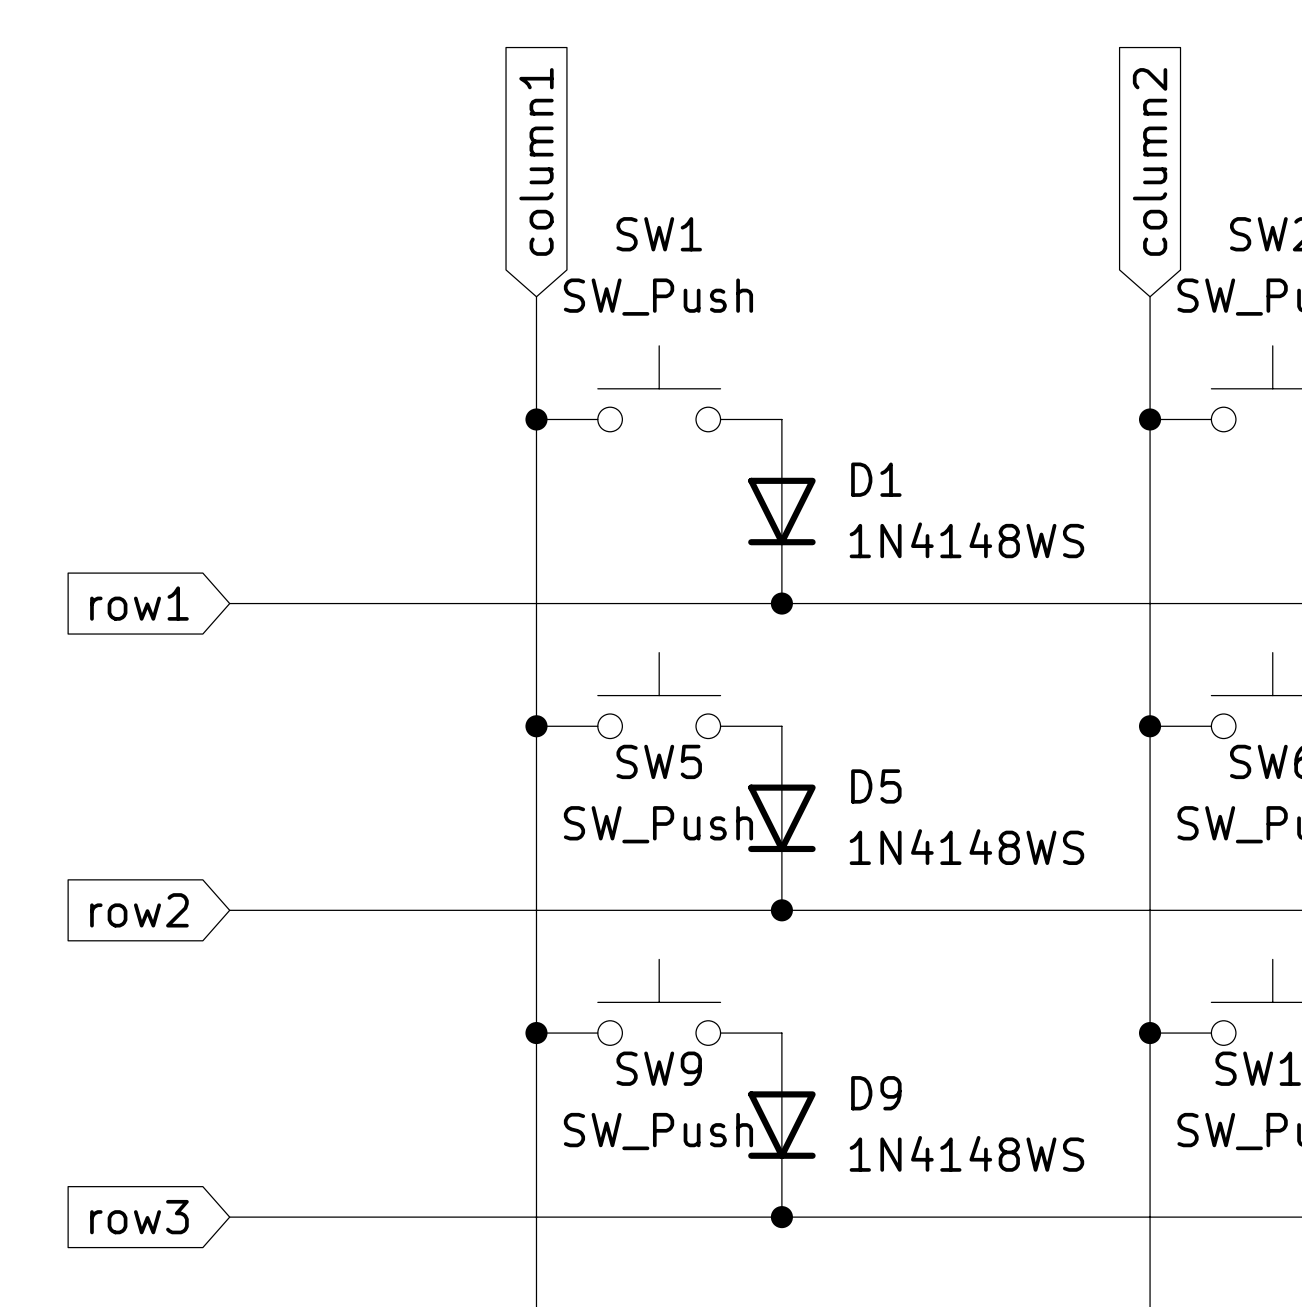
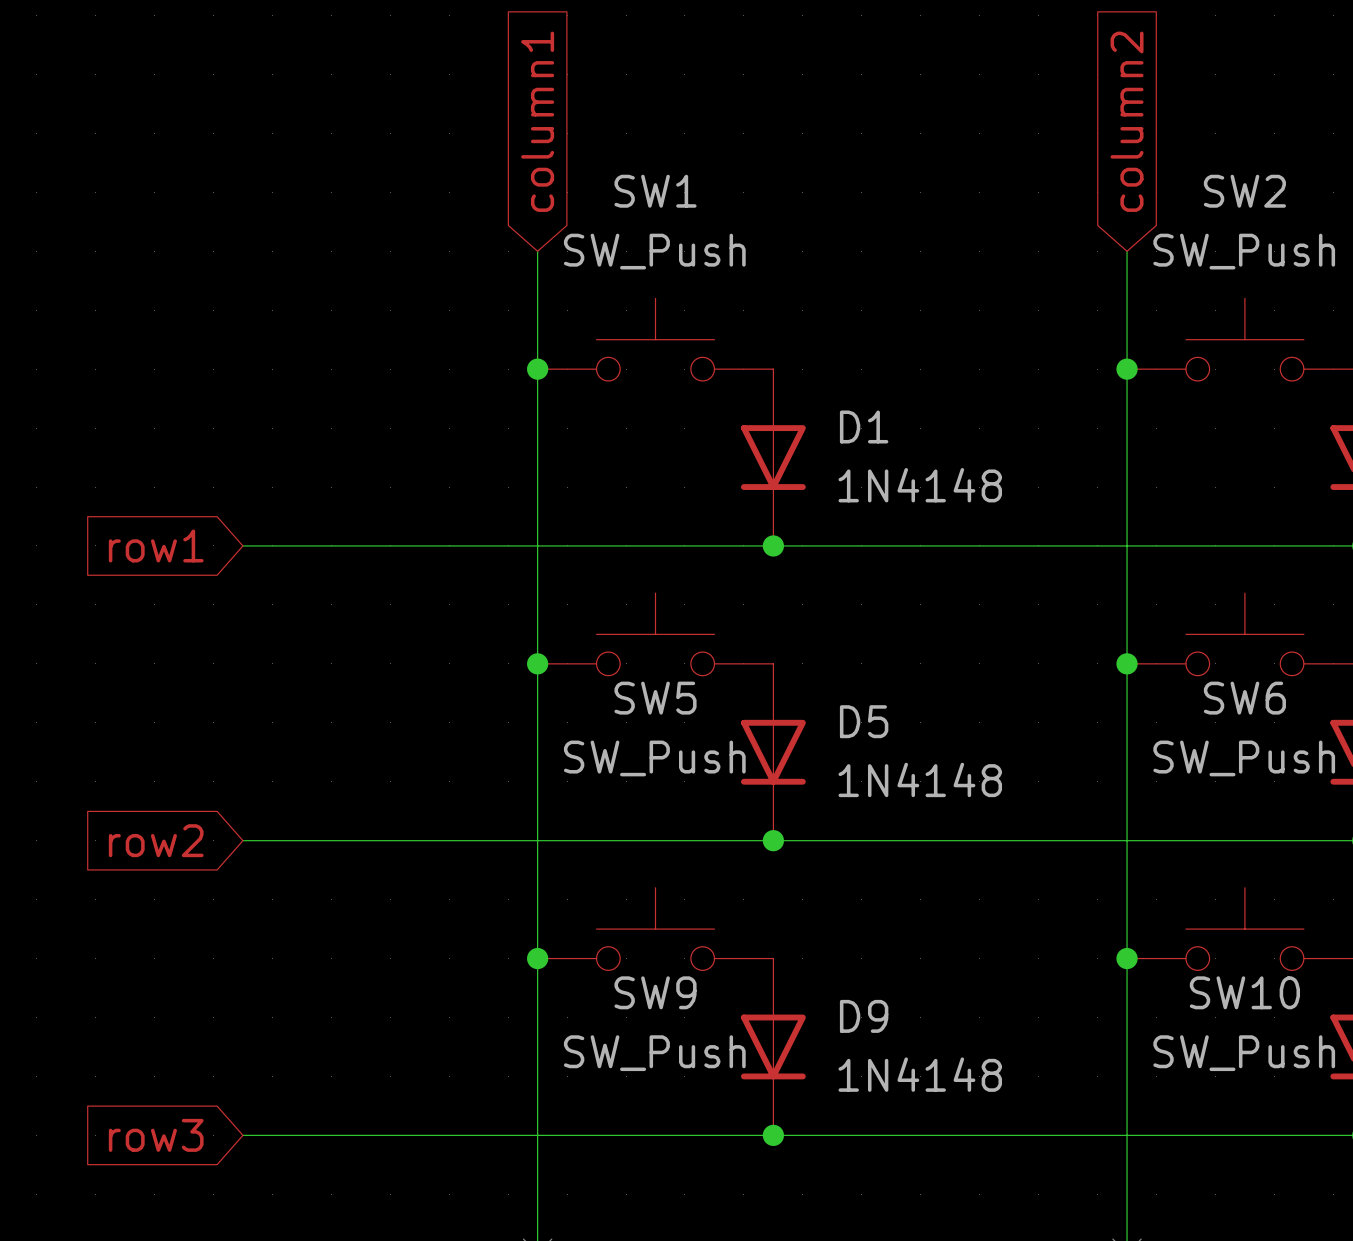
D1 value: 1N4148WS (966, 540) -> 1N4148 (920, 485)
D5 value: 1N4148WS (966, 847) -> 1N4148 (920, 779)
D9 value: 1N4148WS (966, 1153) -> 1N4148 (920, 1074)

